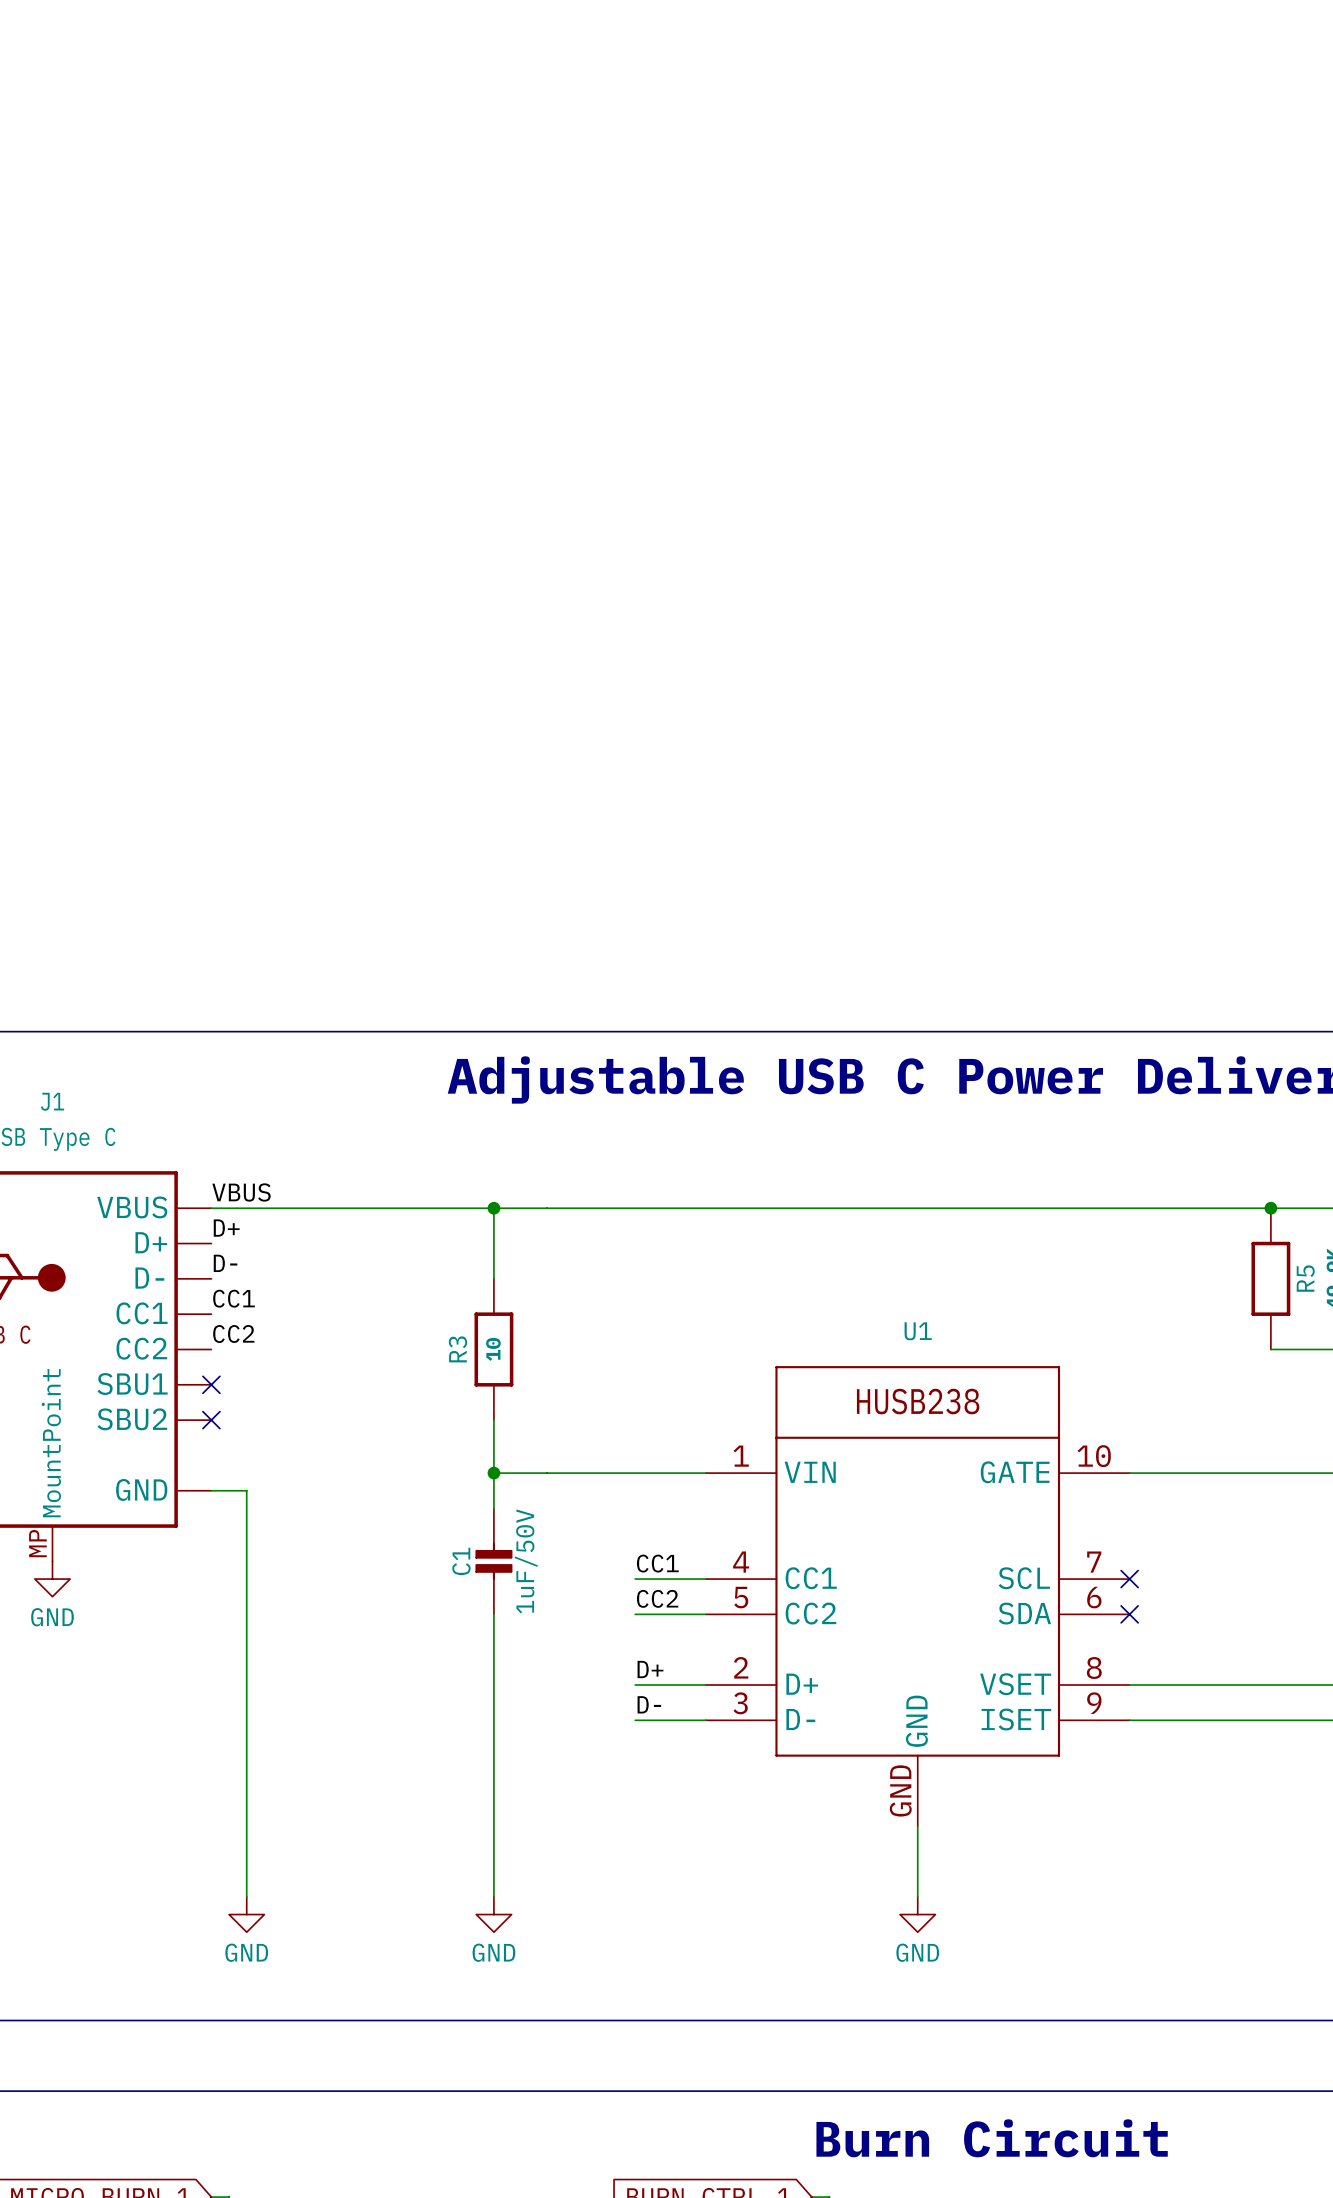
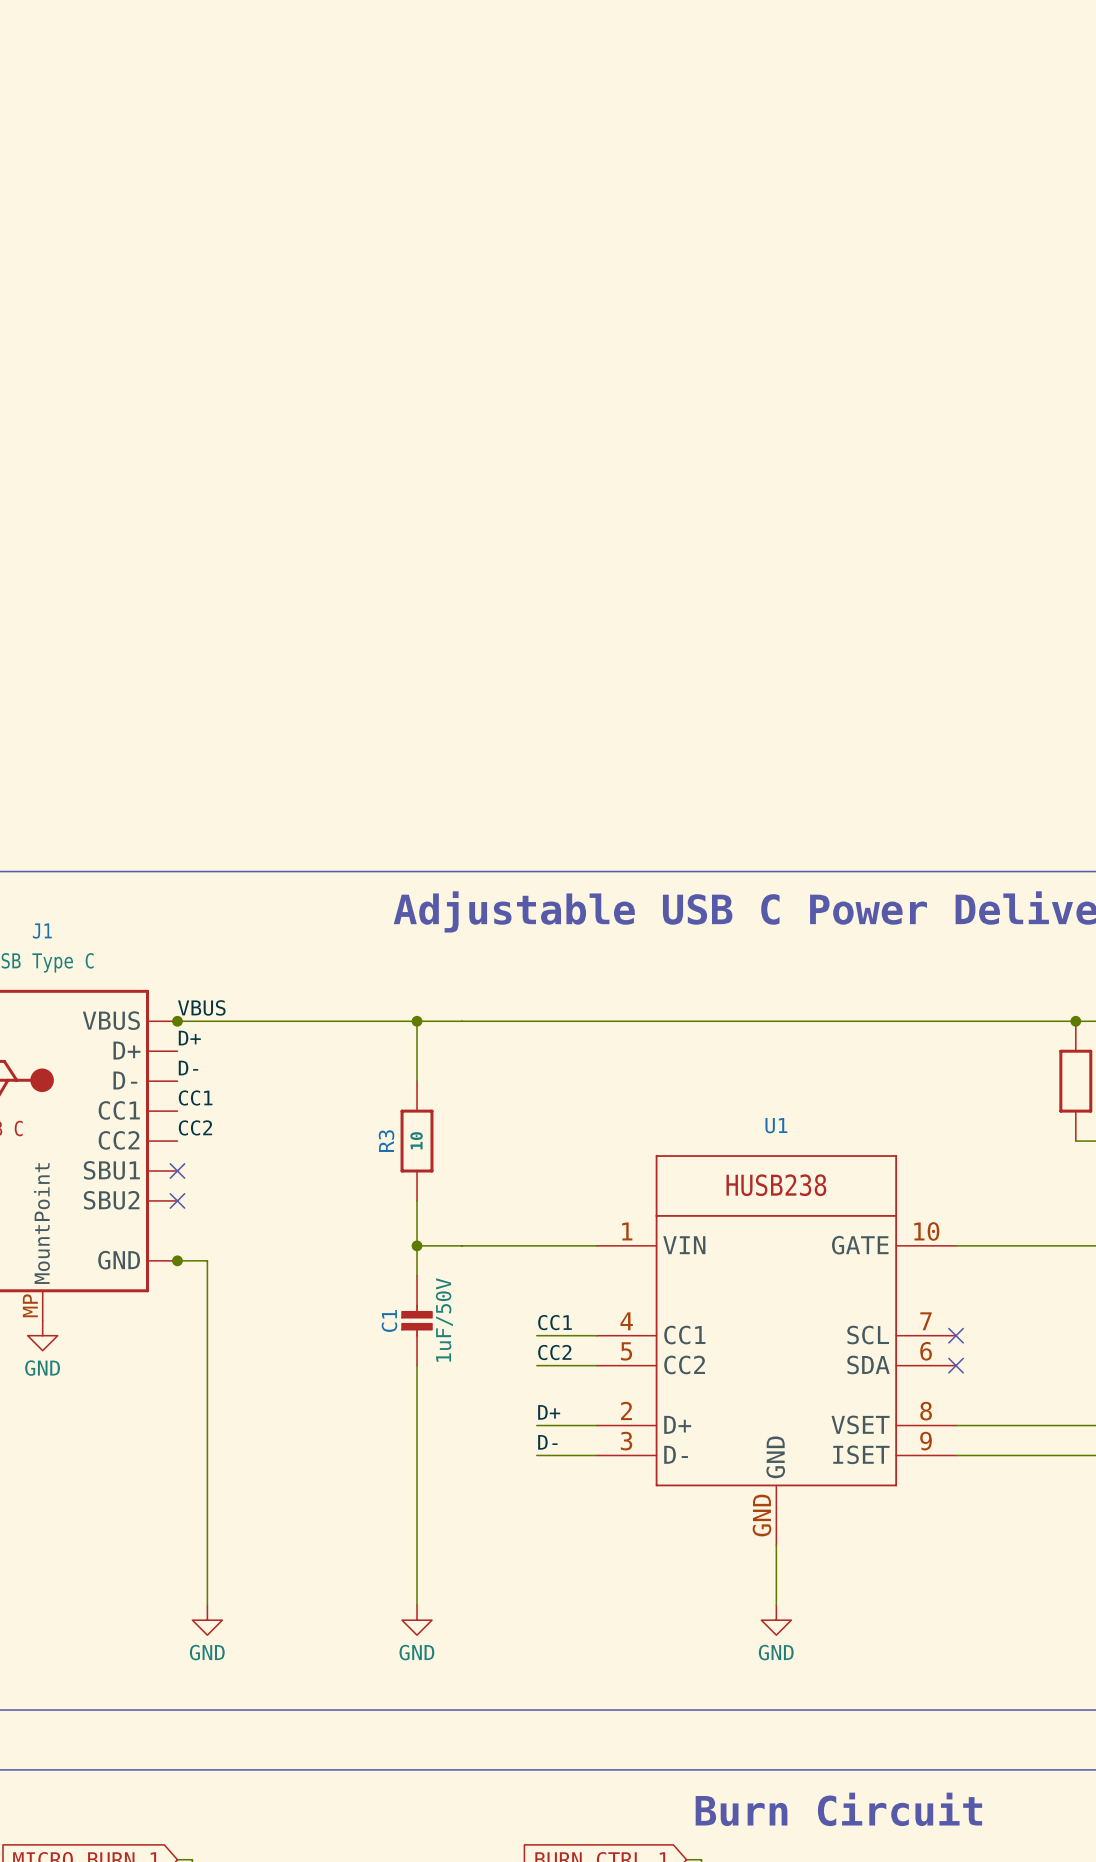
junction: none -> (177, 1021)
junction: none -> (177, 1260)

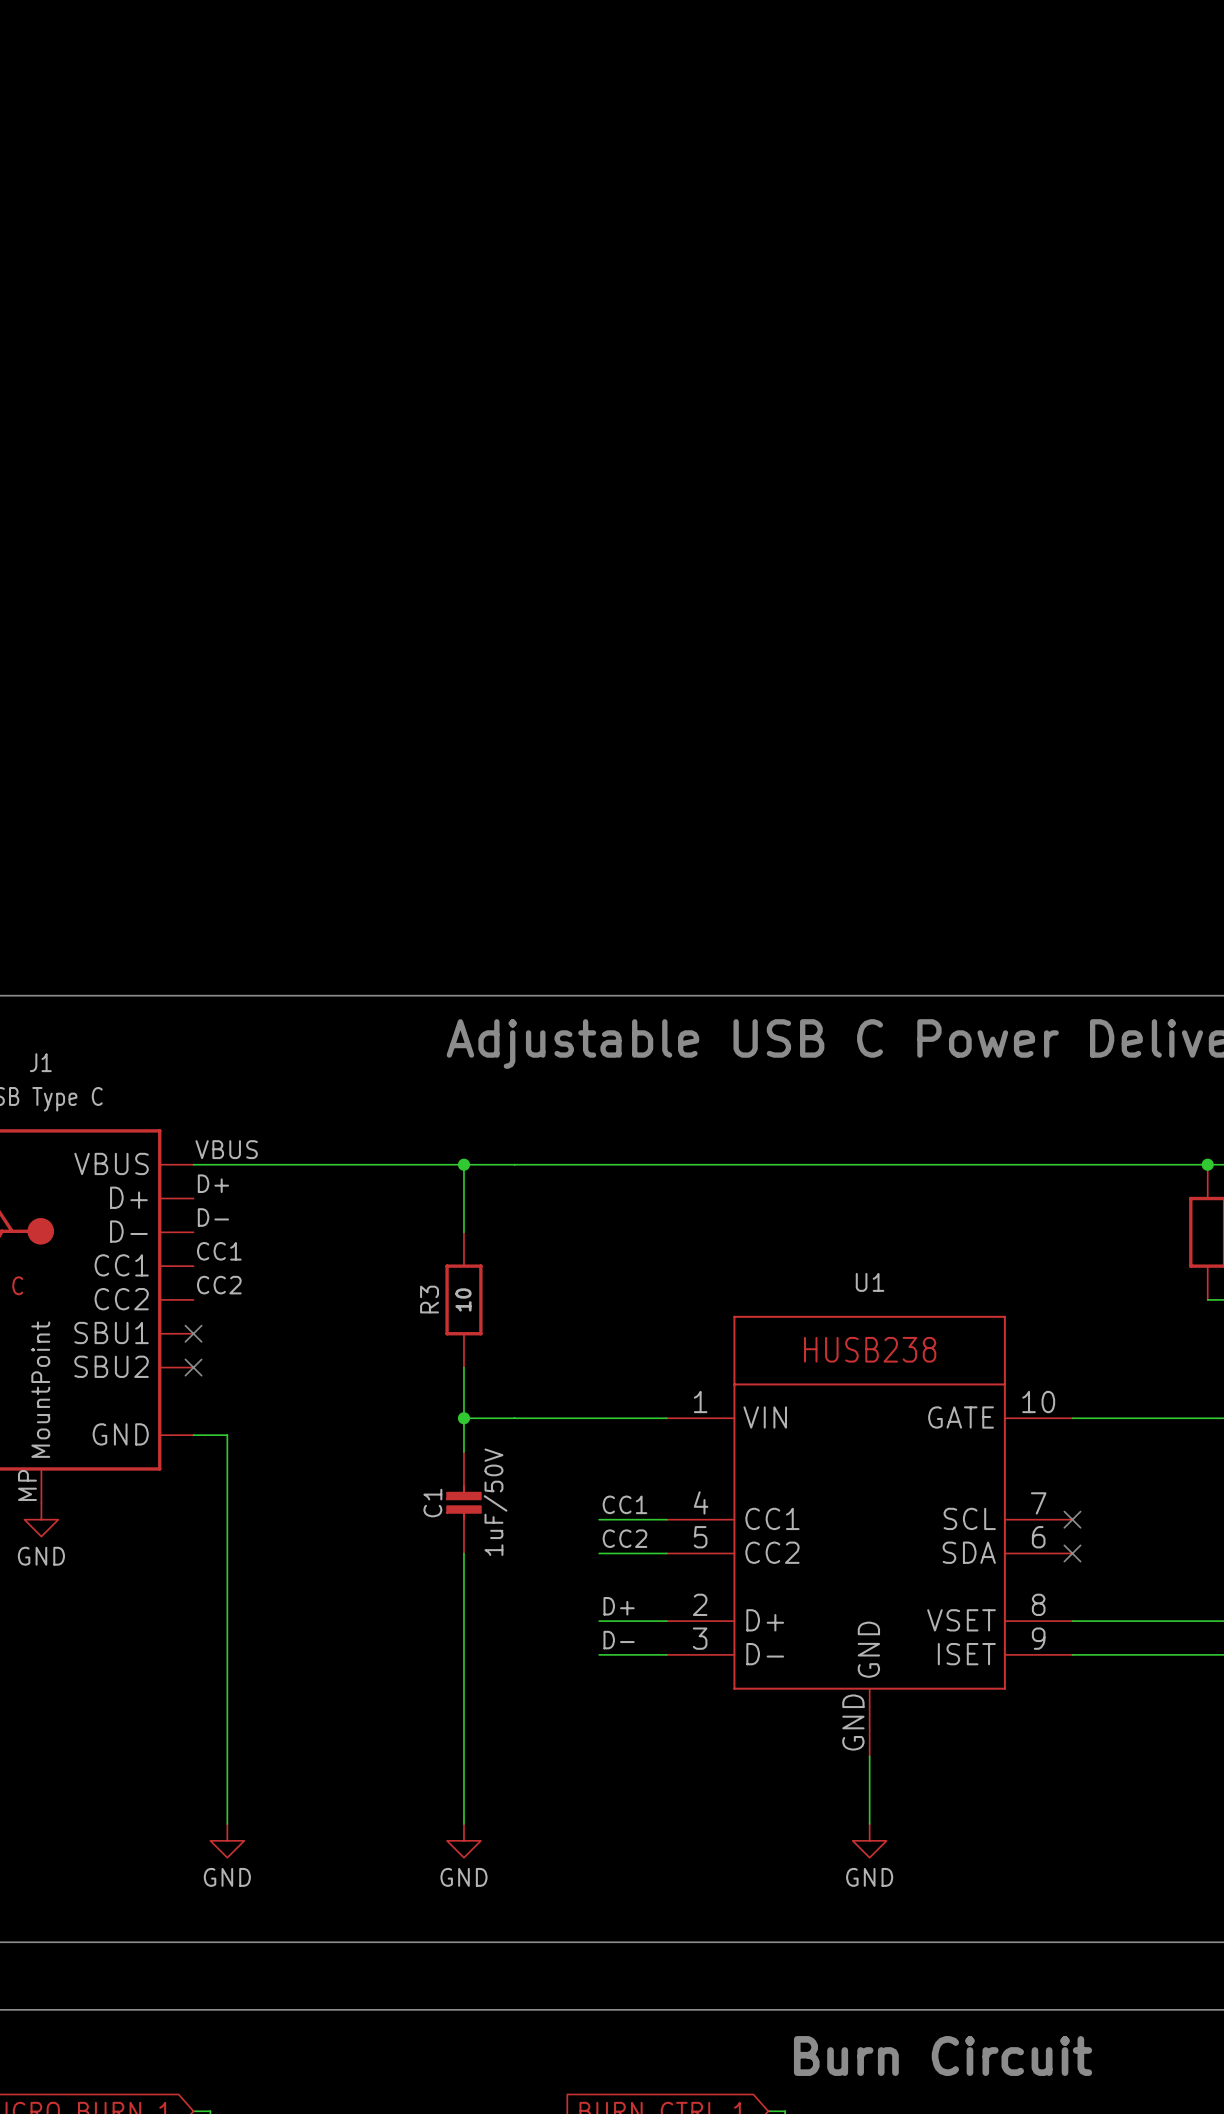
junction: (177, 1021) -> none
junction: (177, 1260) -> none

